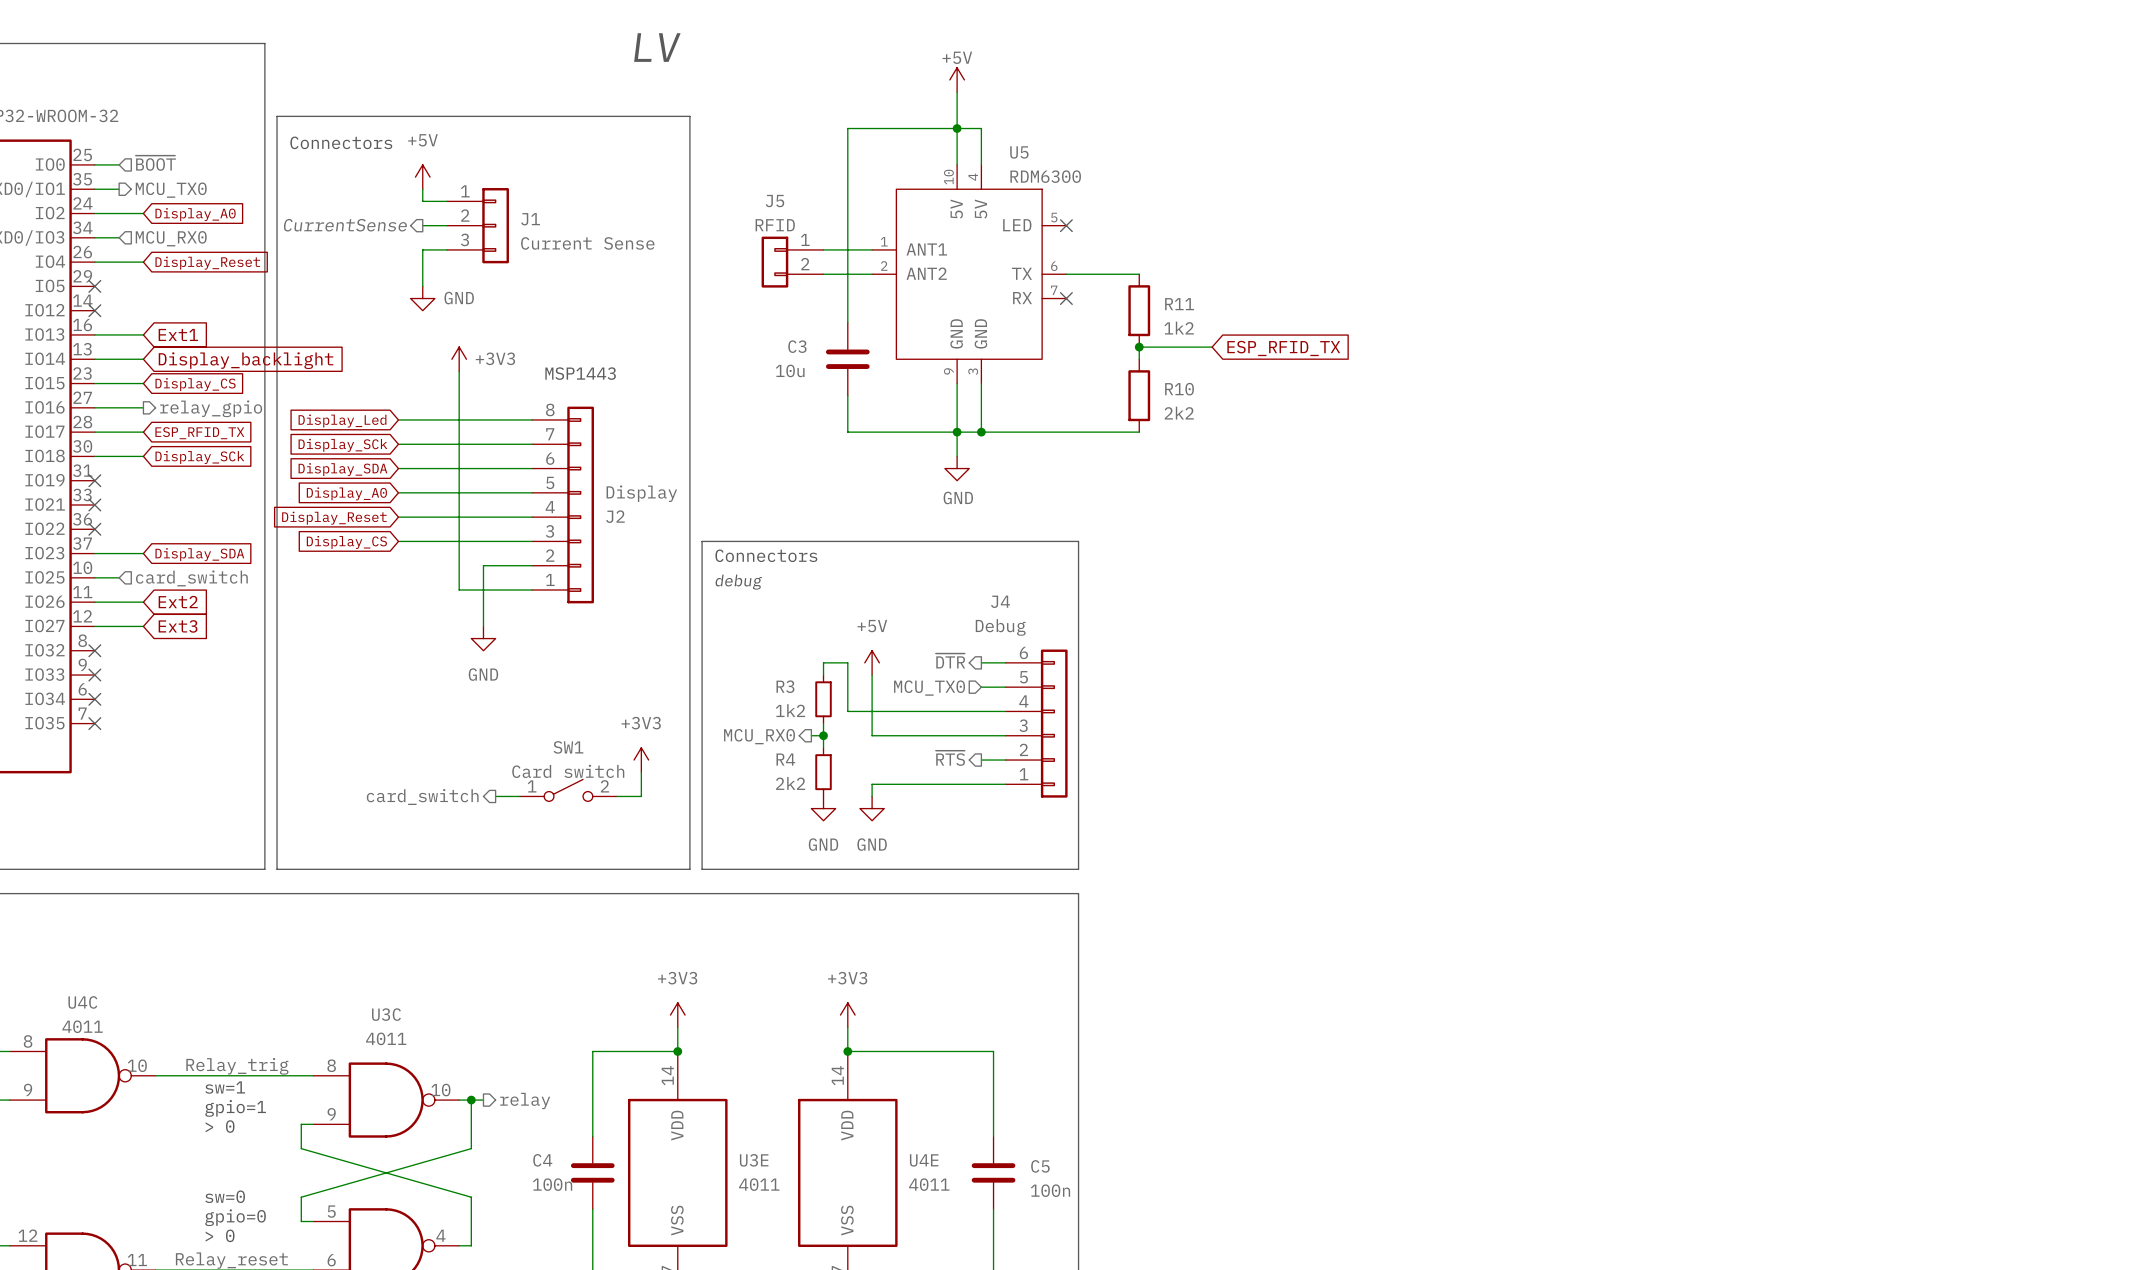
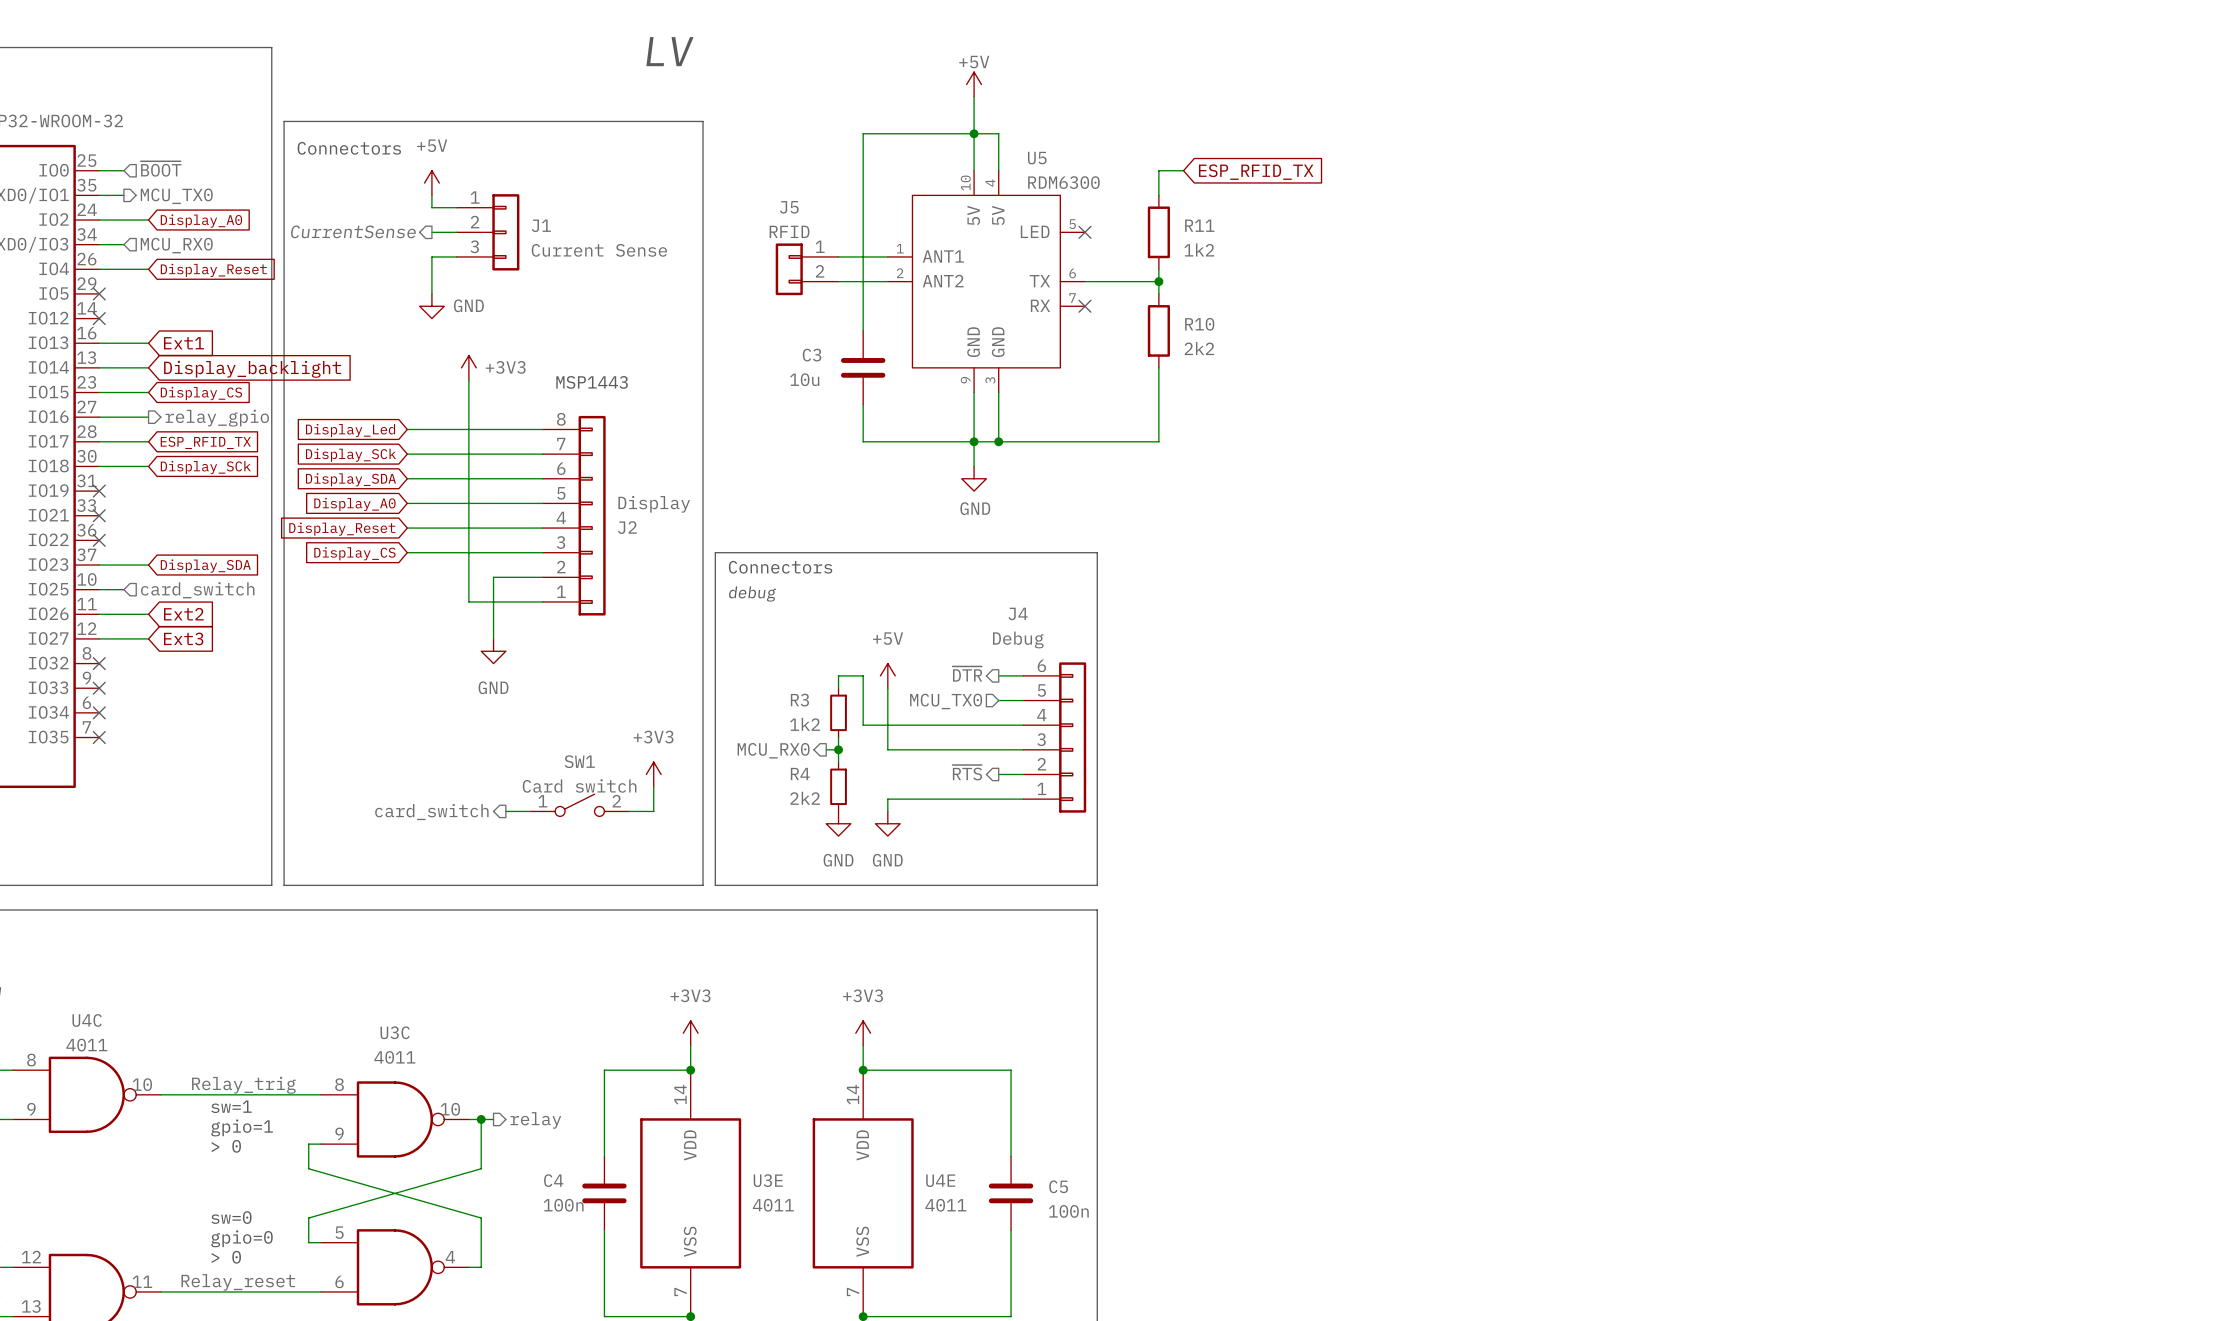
wire: none -> (1183, 170) (1158, 170) (1158, 195)
junction: none -> (1158, 281)
R11 position: (1139, 310) -> (1158, 232)
junction: (1139, 347) -> none
wire: (1212, 347) (1139, 347) (1139, 359) -> (1158, 441) (1158, 367)
global label position: ESP_RFID_TX (1283, 348) -> ESP_RFID_TX (1256, 172)
R10 position: (1139, 395) -> (1158, 330)

